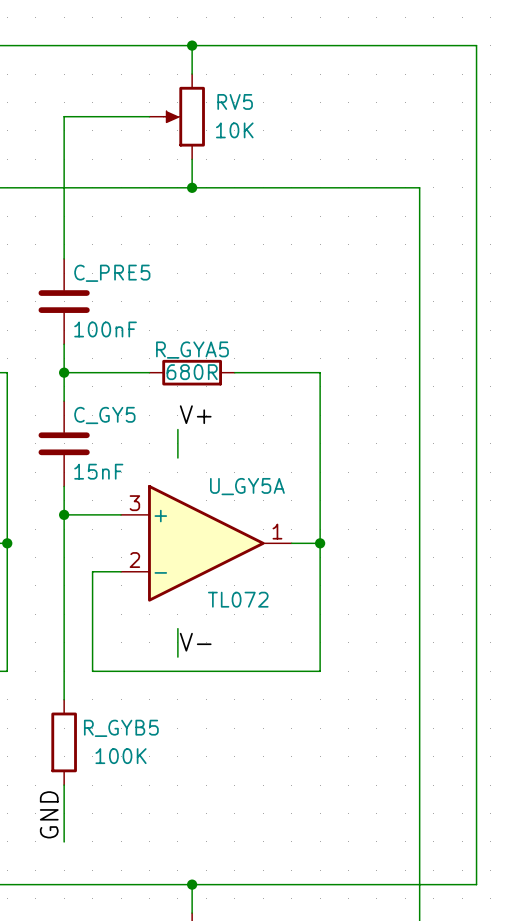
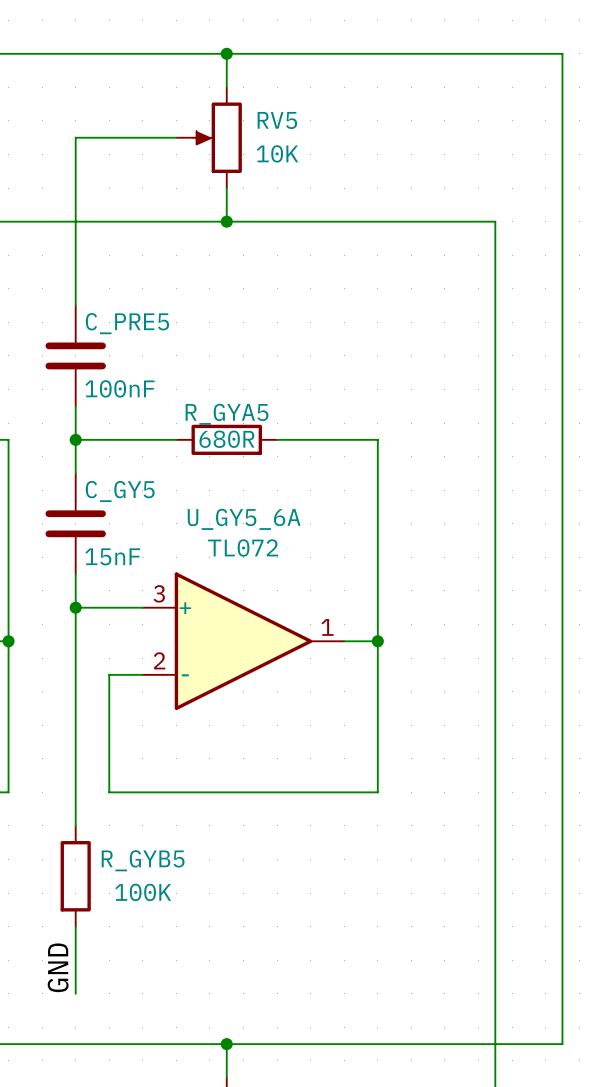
label: V+ (195, 414) -> none
wire: (177, 429) (177, 458) -> none
U_GY5A name: U_GY5A (247, 486) -> U_GY5_6A (244, 519)
U_GY5A value position: TL072 (238, 599) -> TL072 (243, 548)
wire: (177, 628) (177, 657) -> none
label: V- (195, 642) -> none

